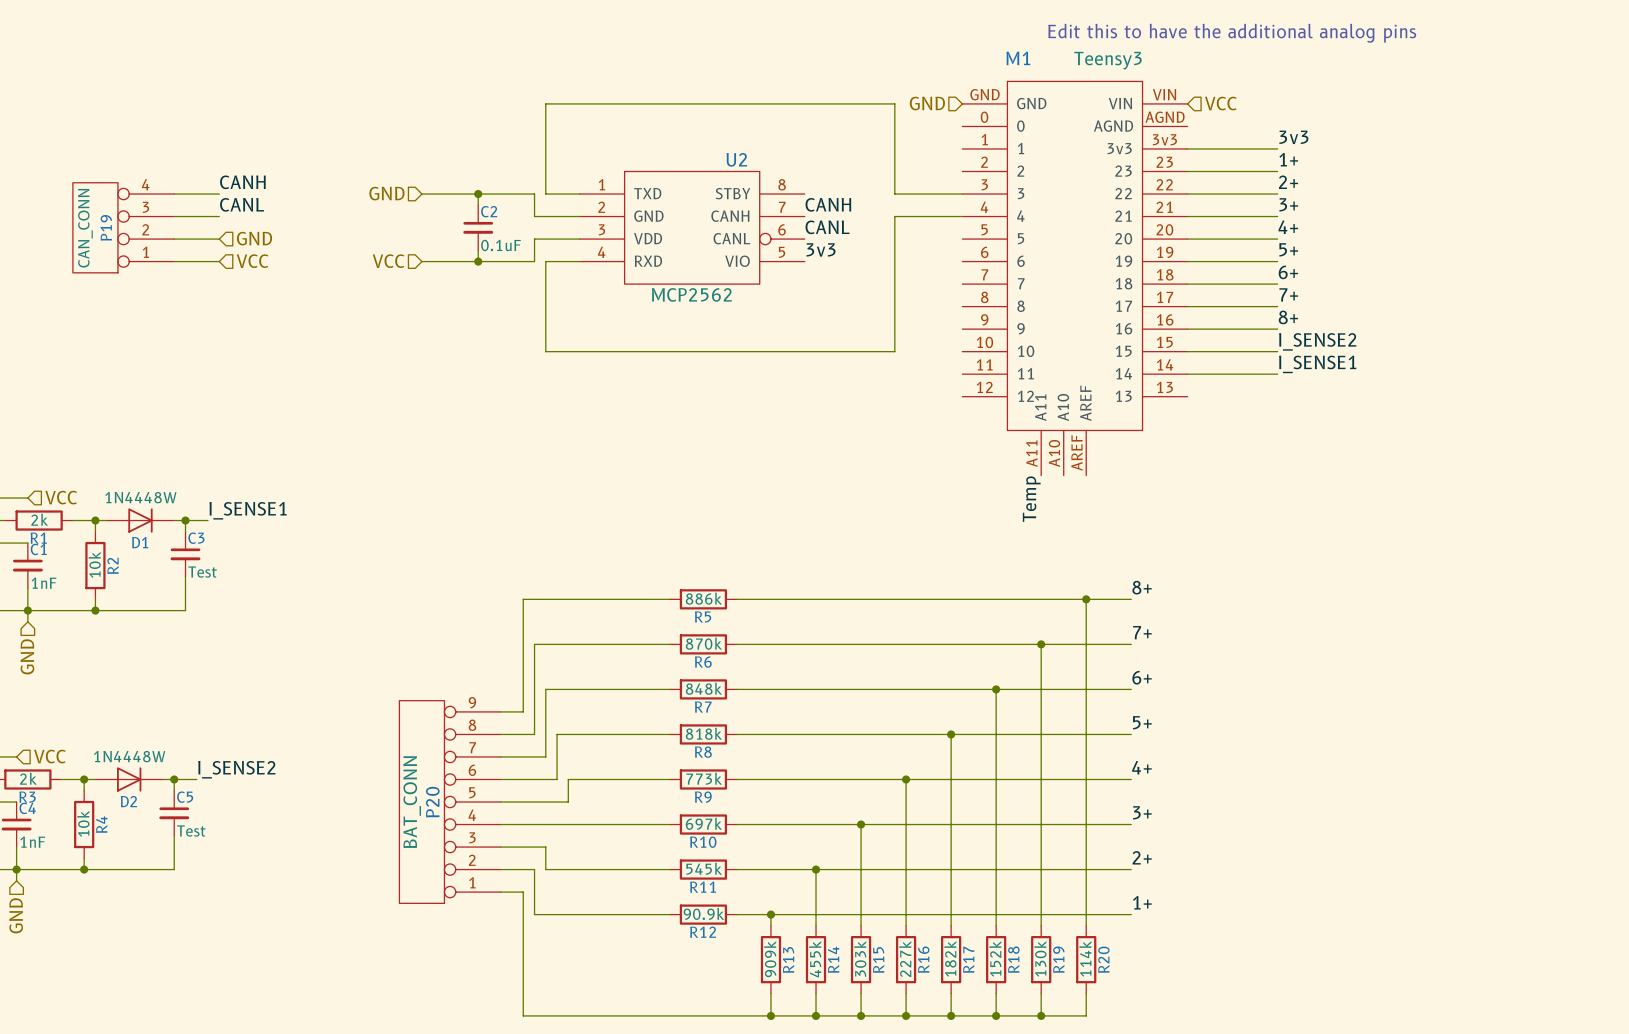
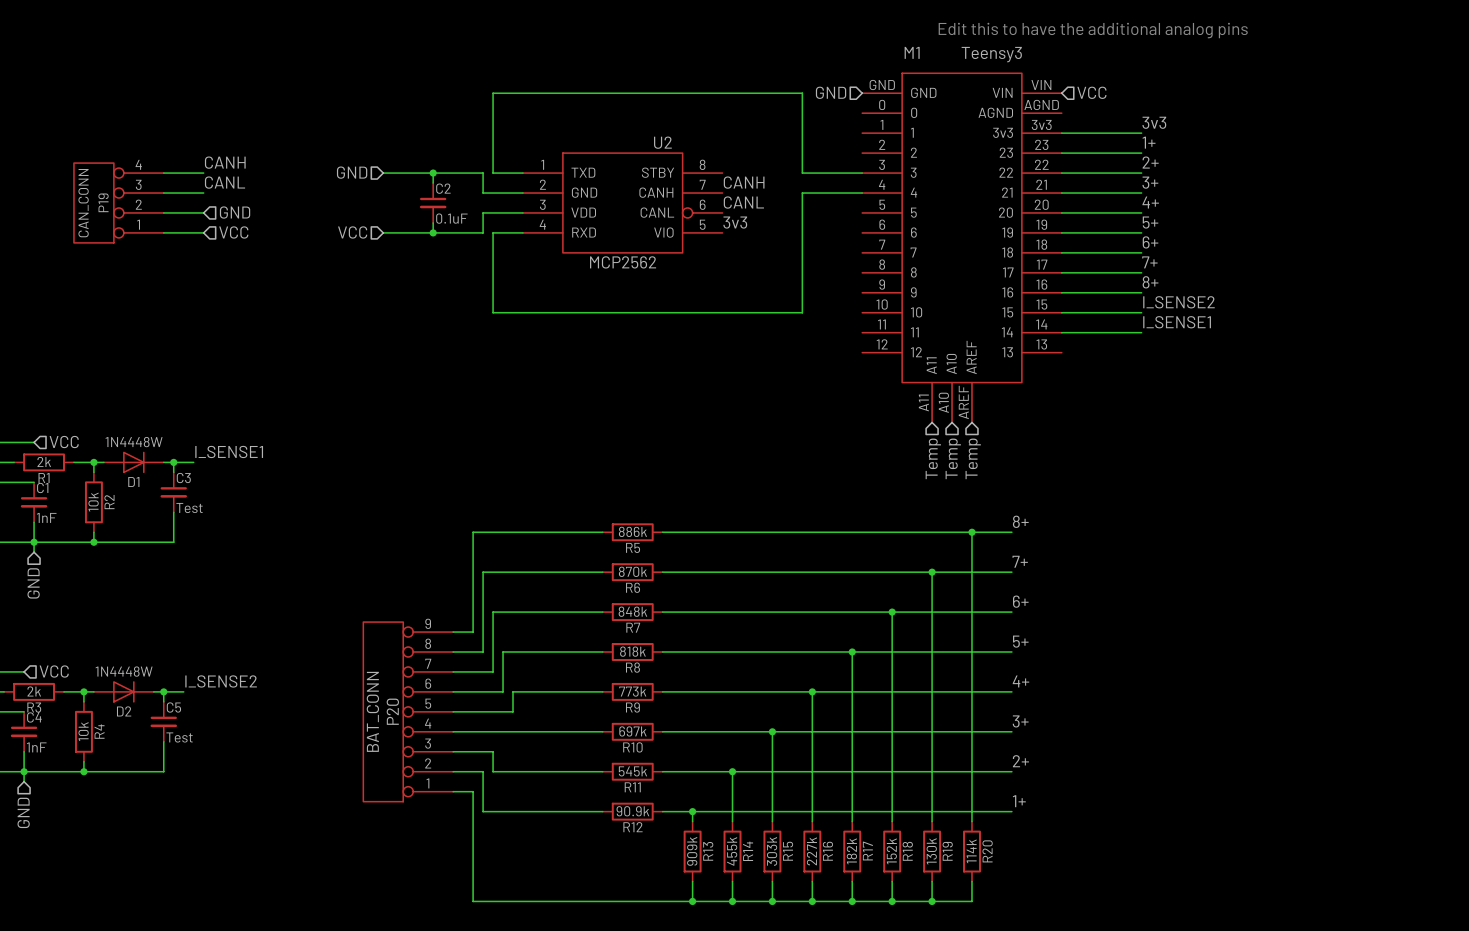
label: Temp (1031, 499) -> none
hierarchical label: none -> Temp (933, 458)
hierarchical label: none -> Temp (953, 458)
hierarchical label: none -> Temp (973, 458)

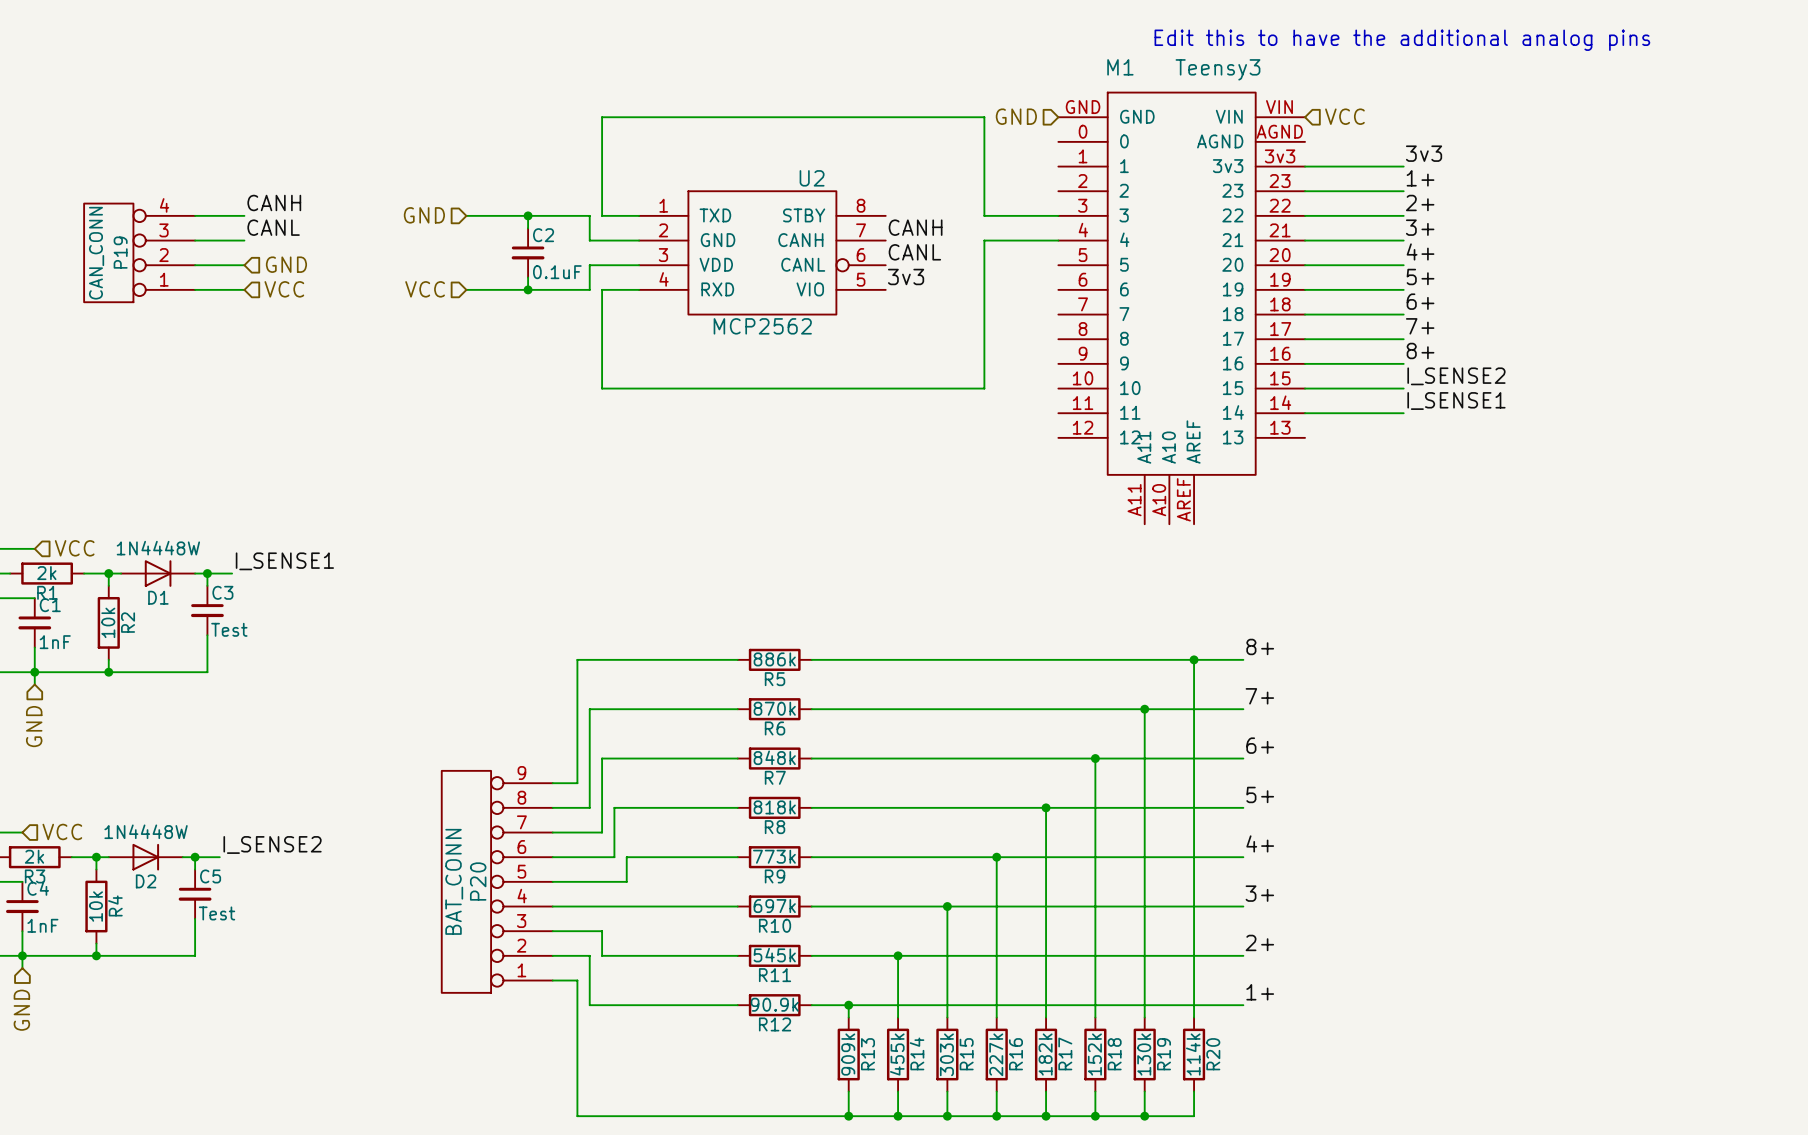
hierarchical label: Temp (933, 458) -> none
hierarchical label: Temp (953, 458) -> none
hierarchical label: Temp (973, 458) -> none

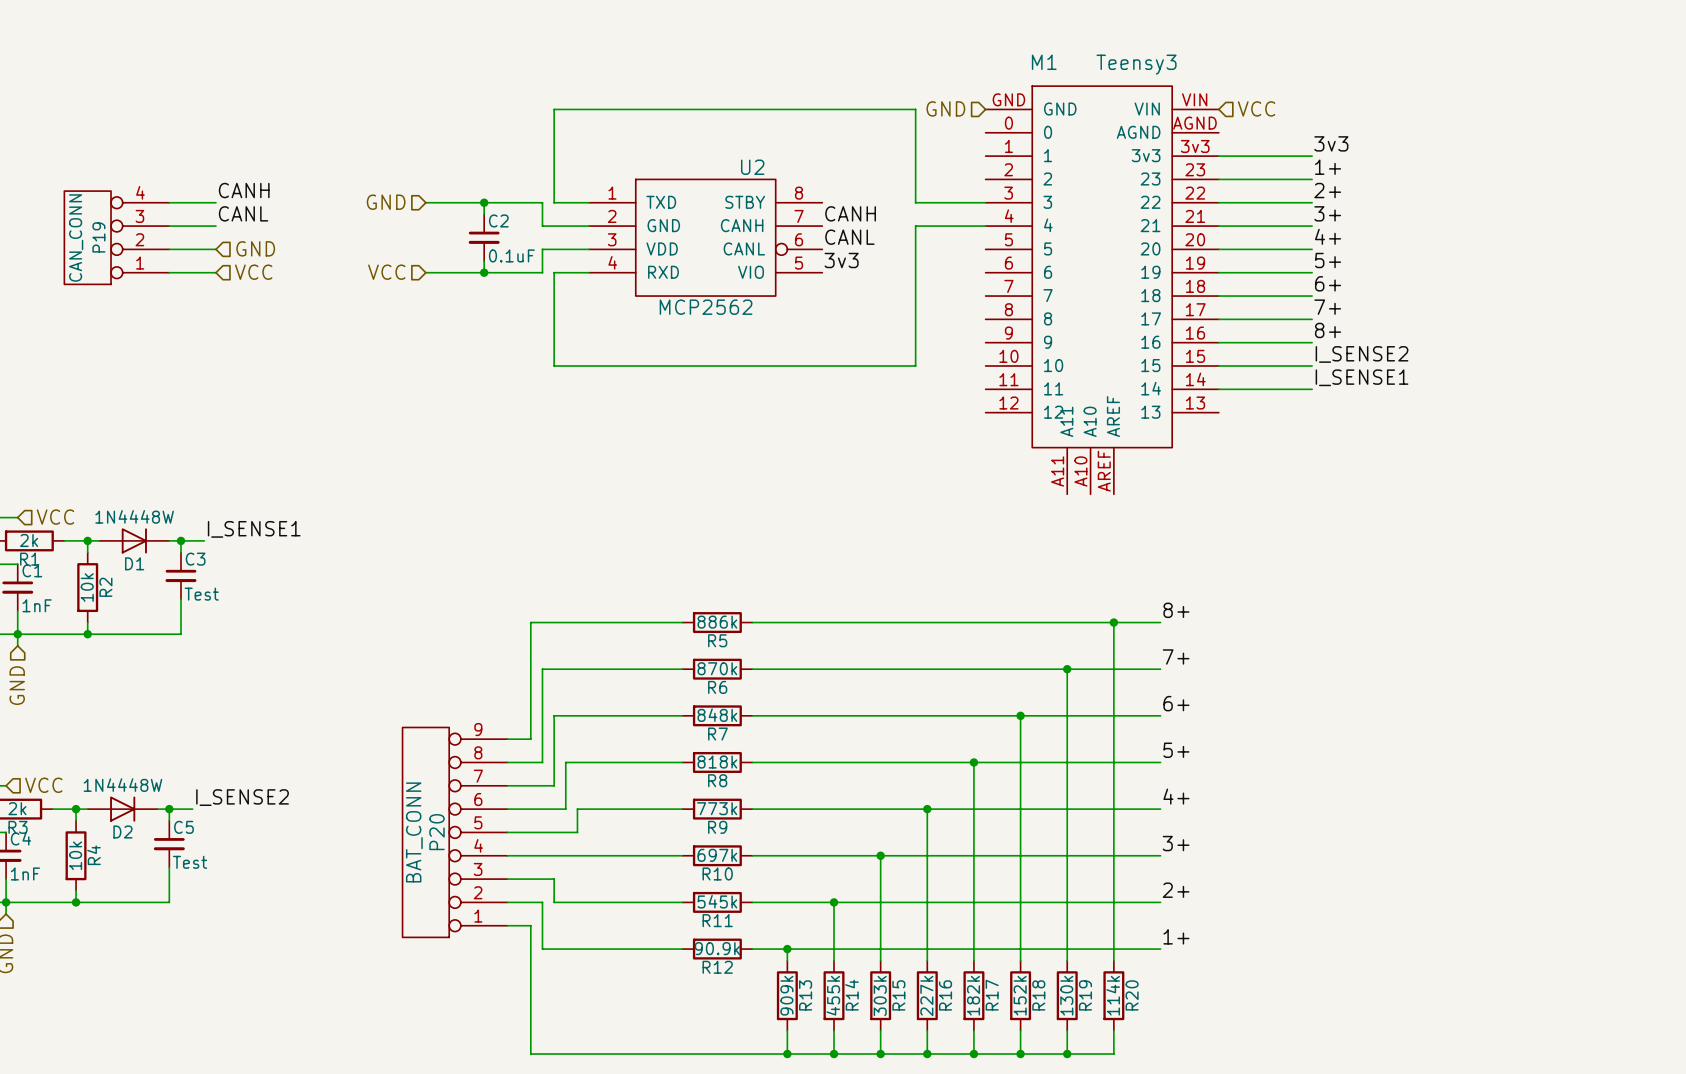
text: Edit this to have the additional analog pins (1402, 40) -> none

